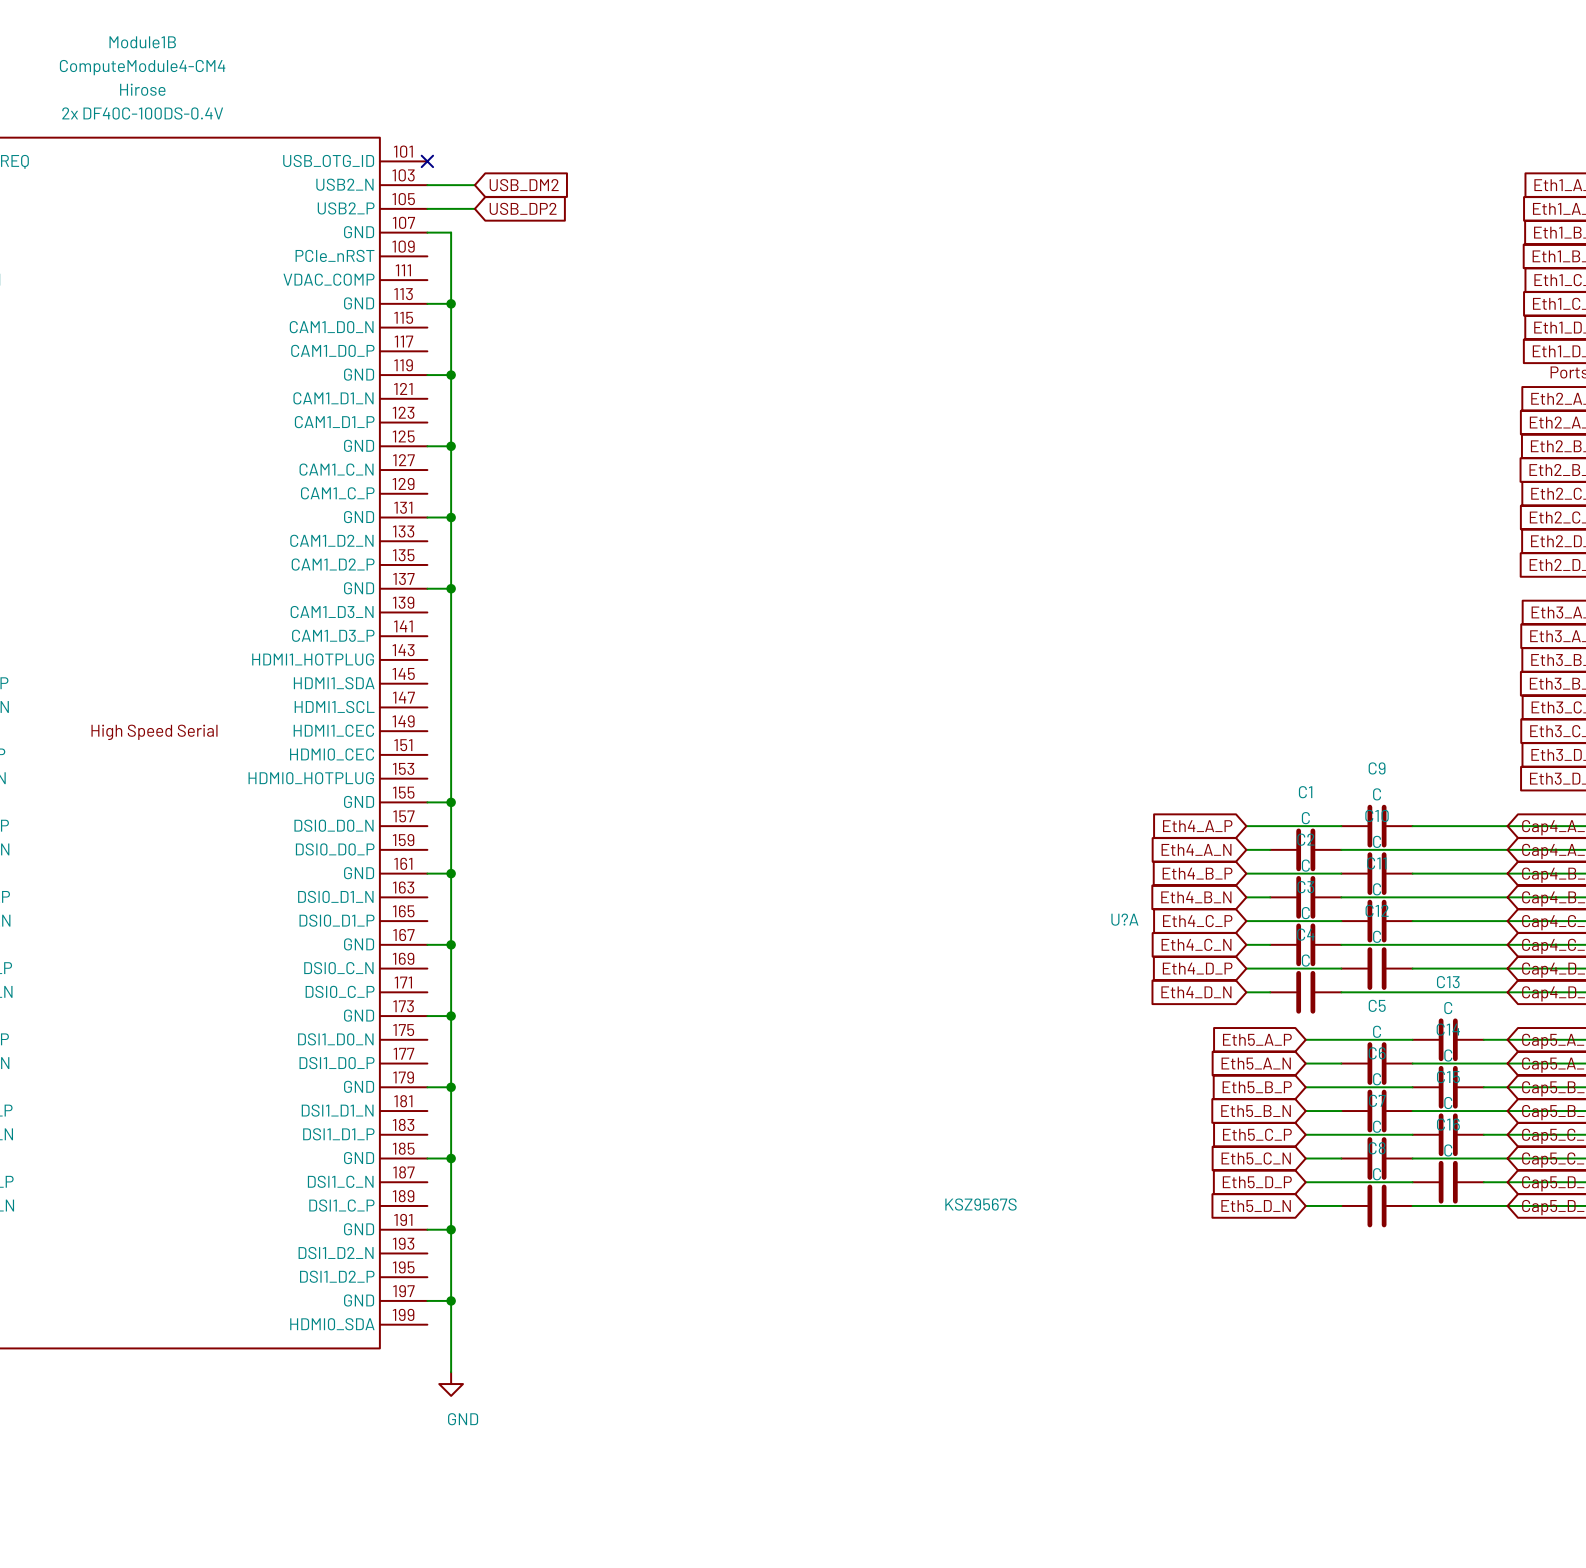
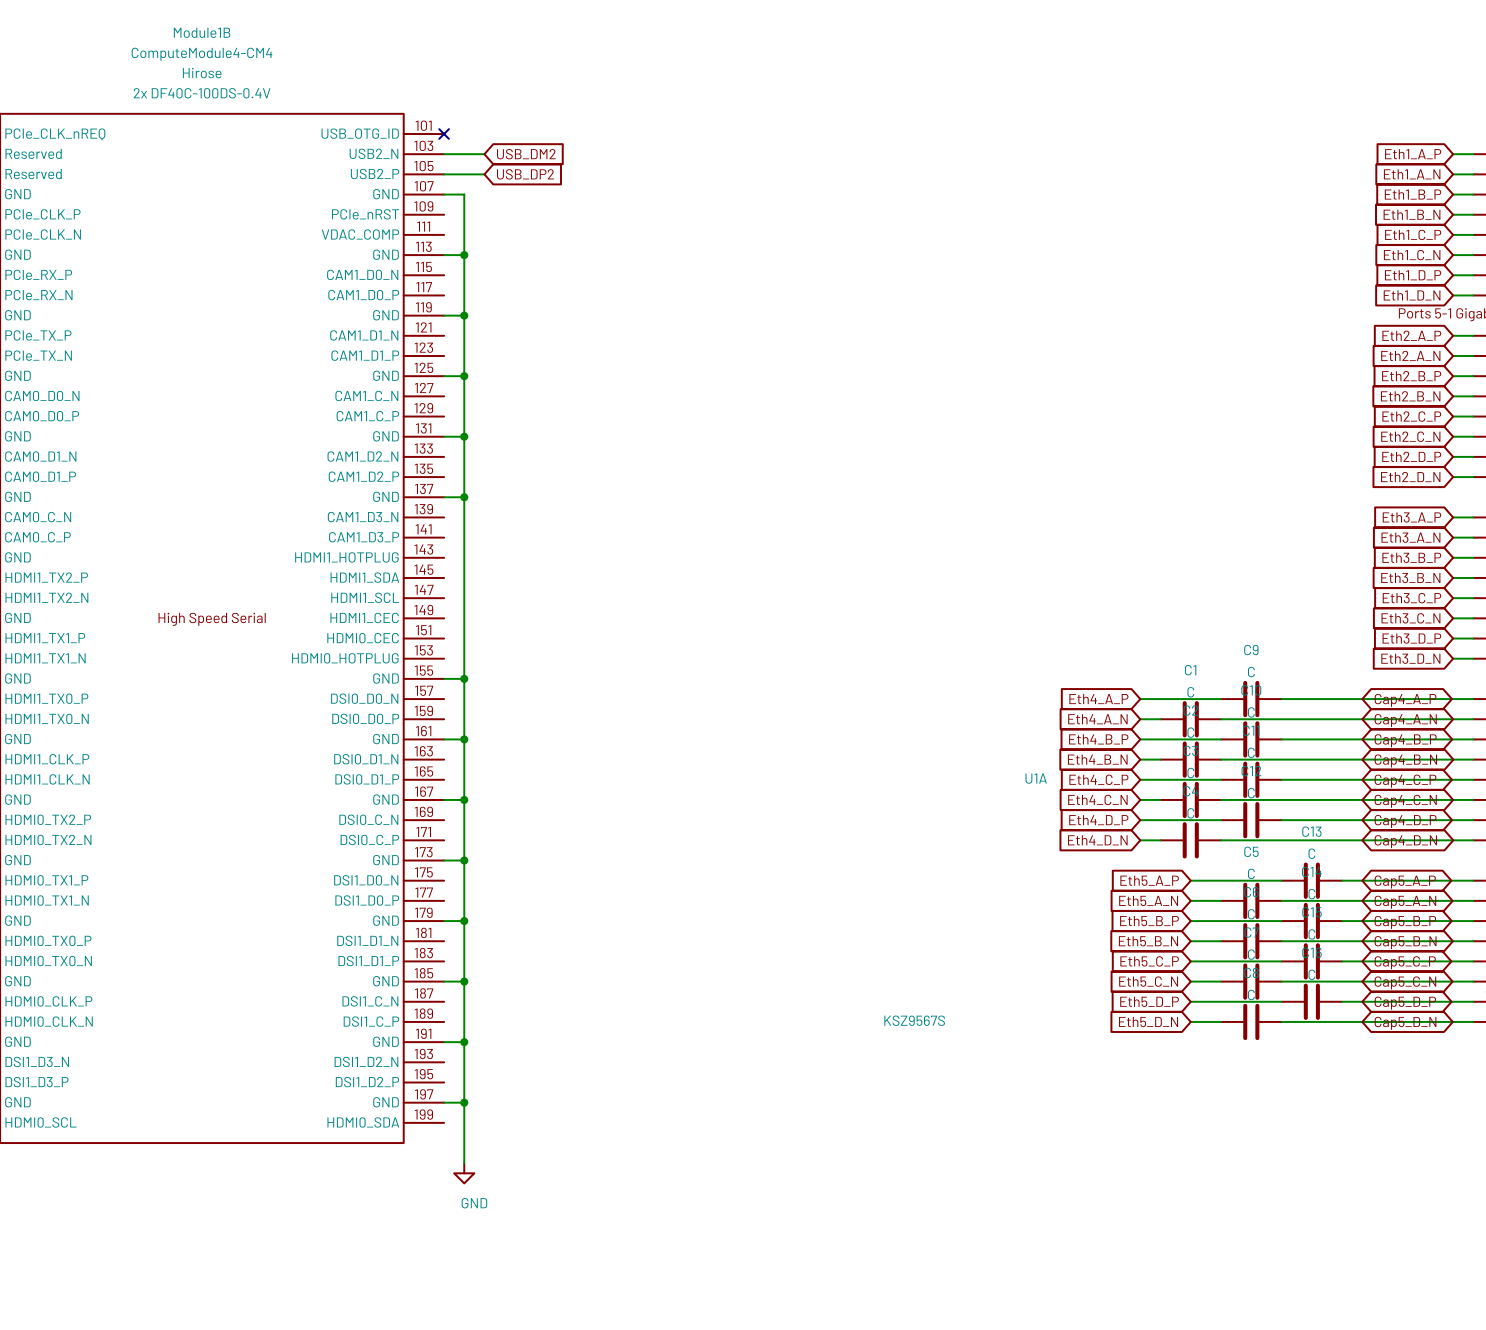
U?A name: U?A (1124, 919) -> U1A (1036, 778)

